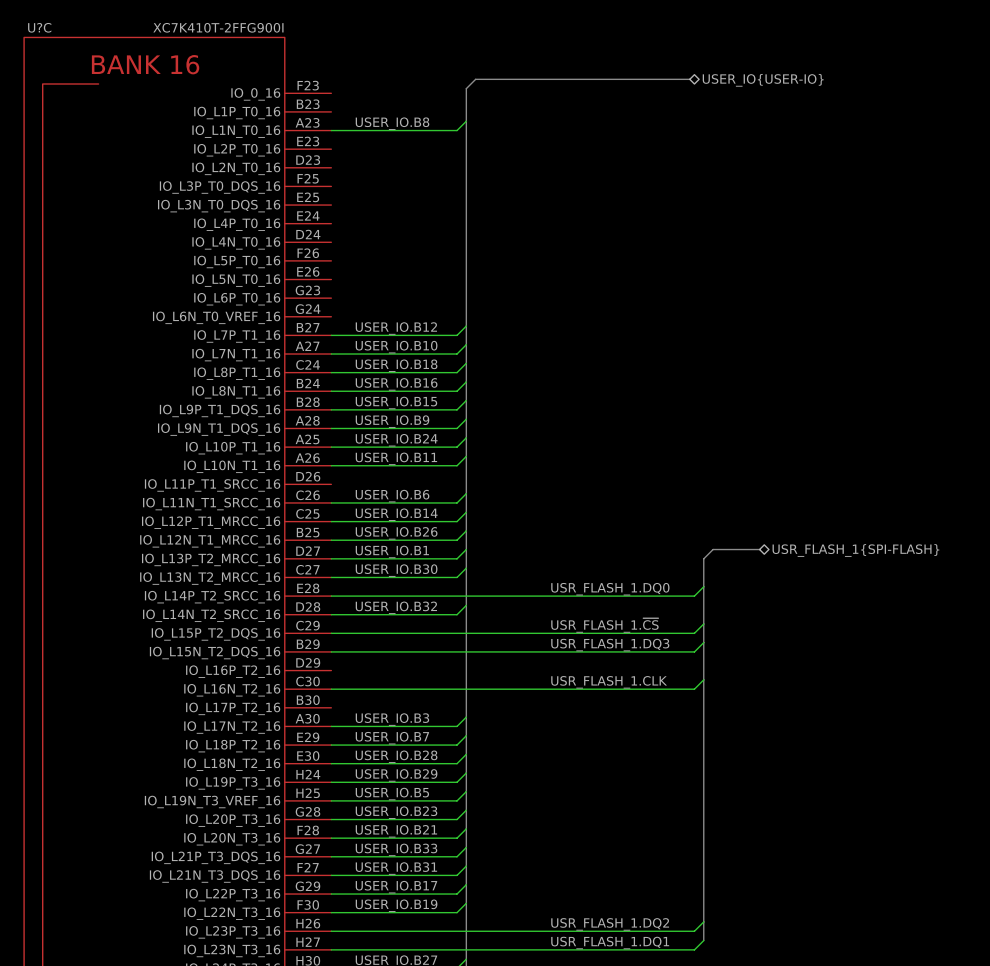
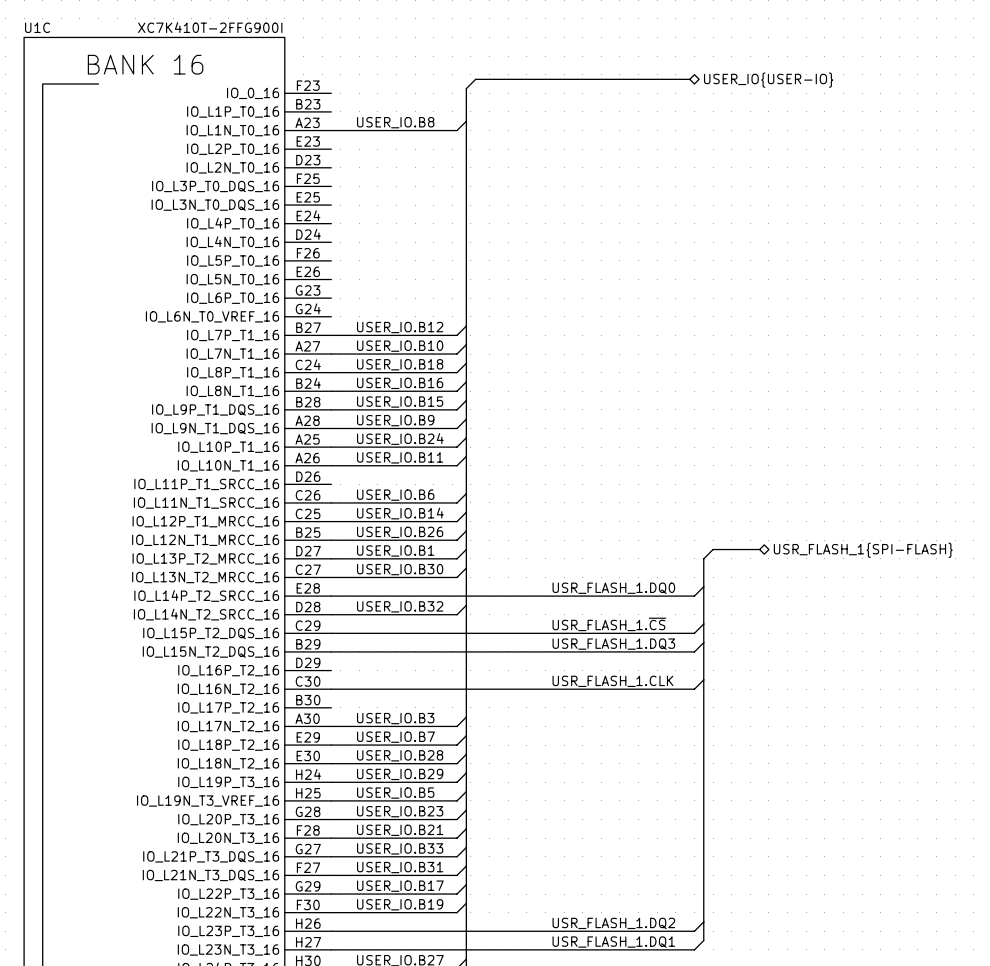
U?C name: U?C (39, 27) -> U1C (37, 27)

